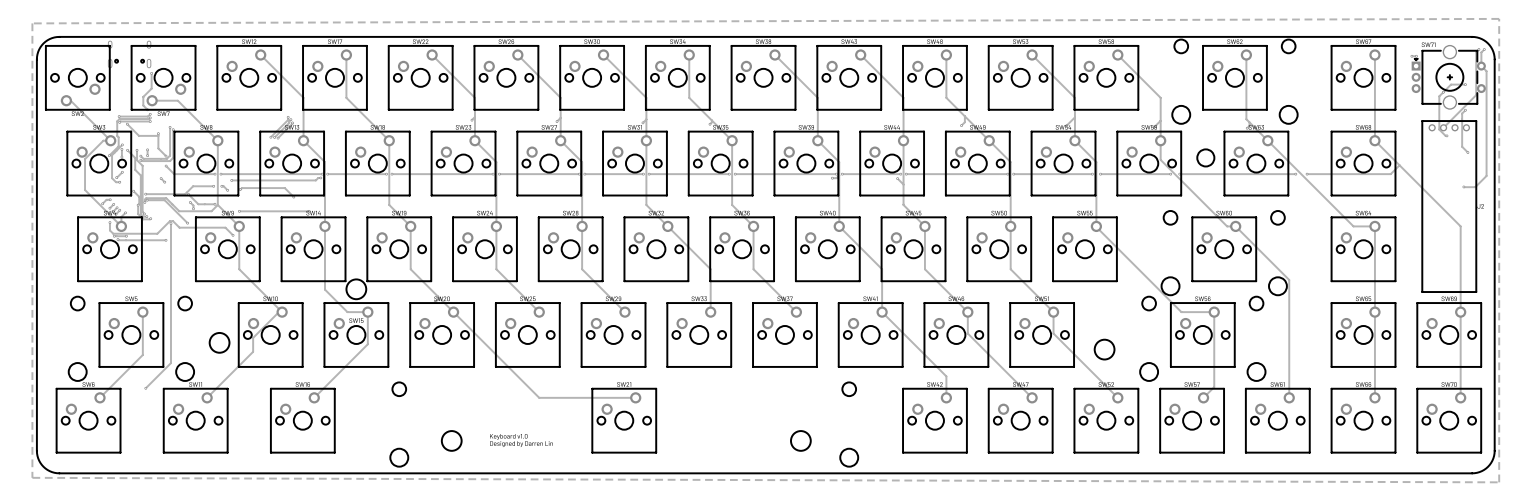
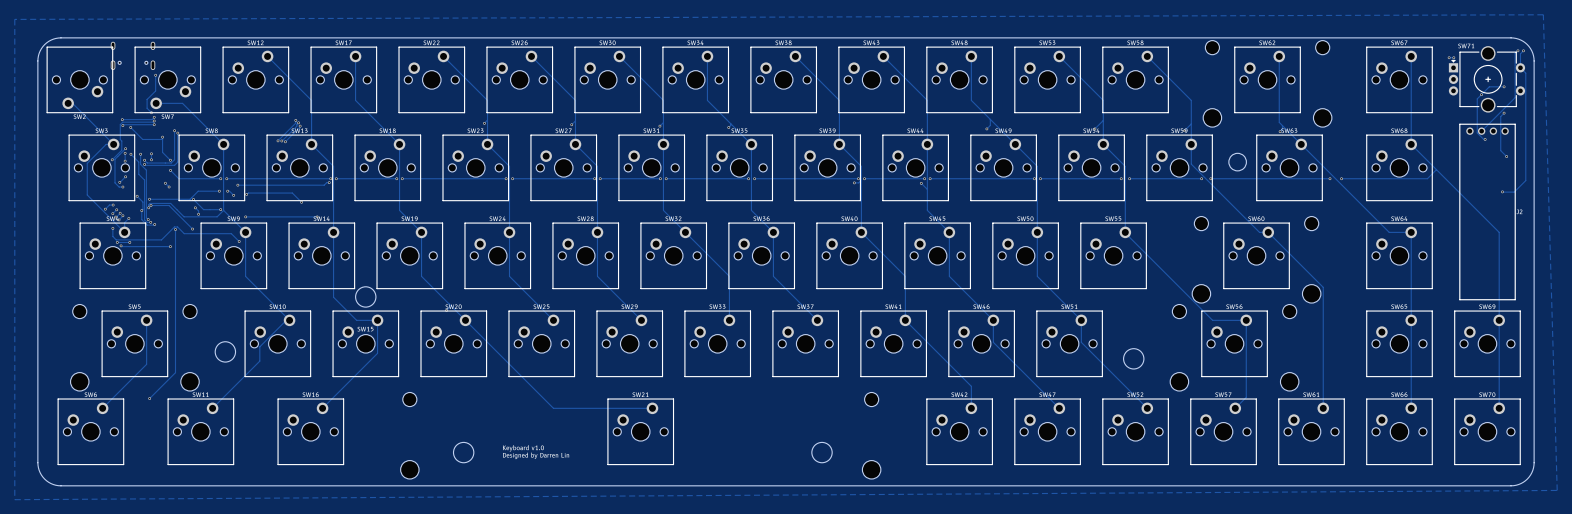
zone outline: (1499, 18) (32, 23) (32, 477) (1499, 482) (1499, 18) -> (1543, 14) (14, 19) (14, 499) (1557, 490) (1543, 14)

